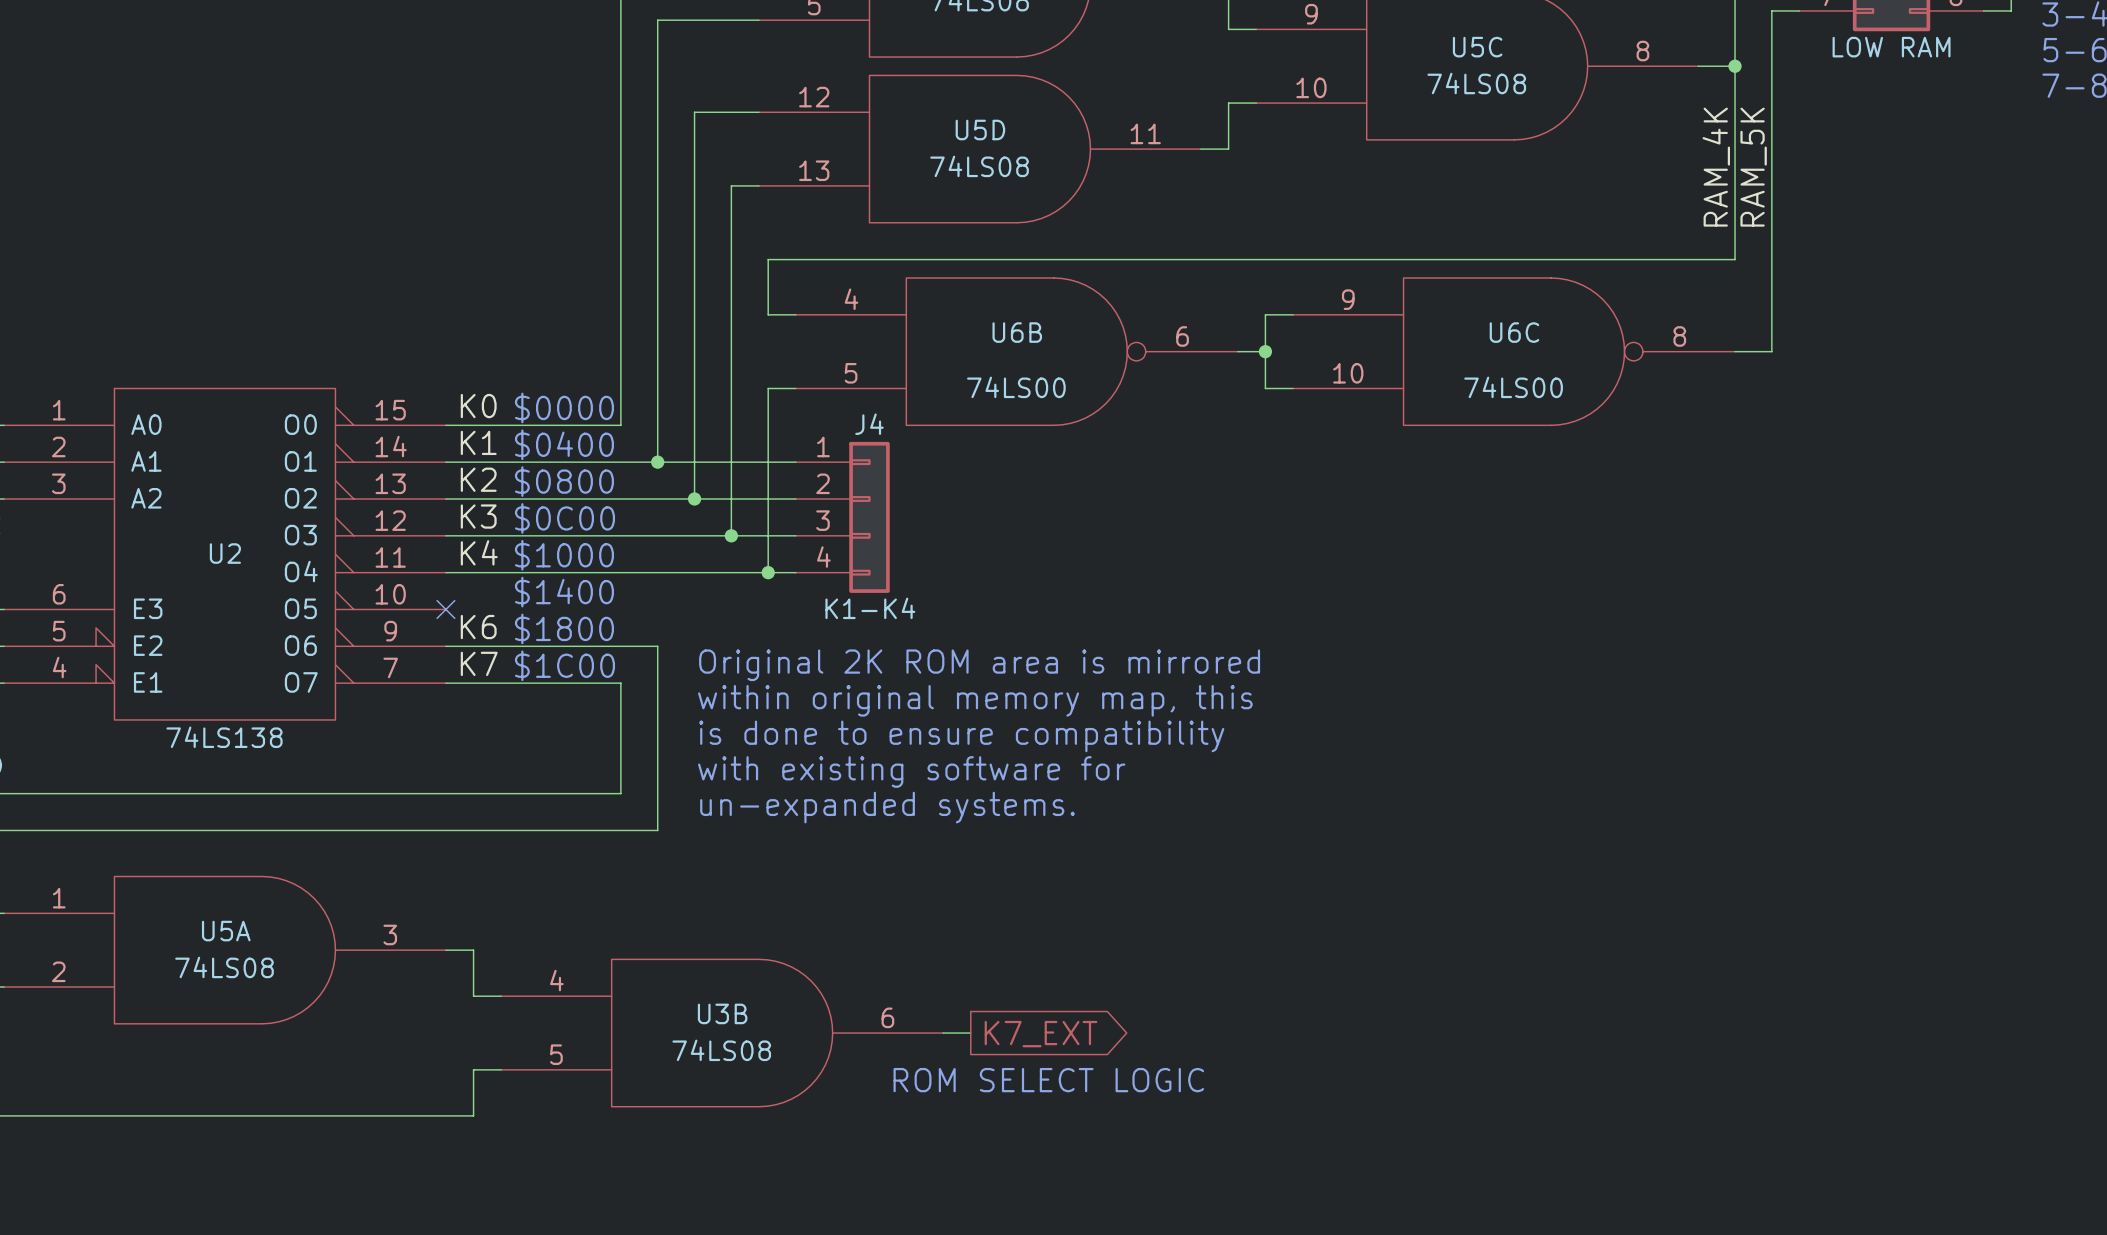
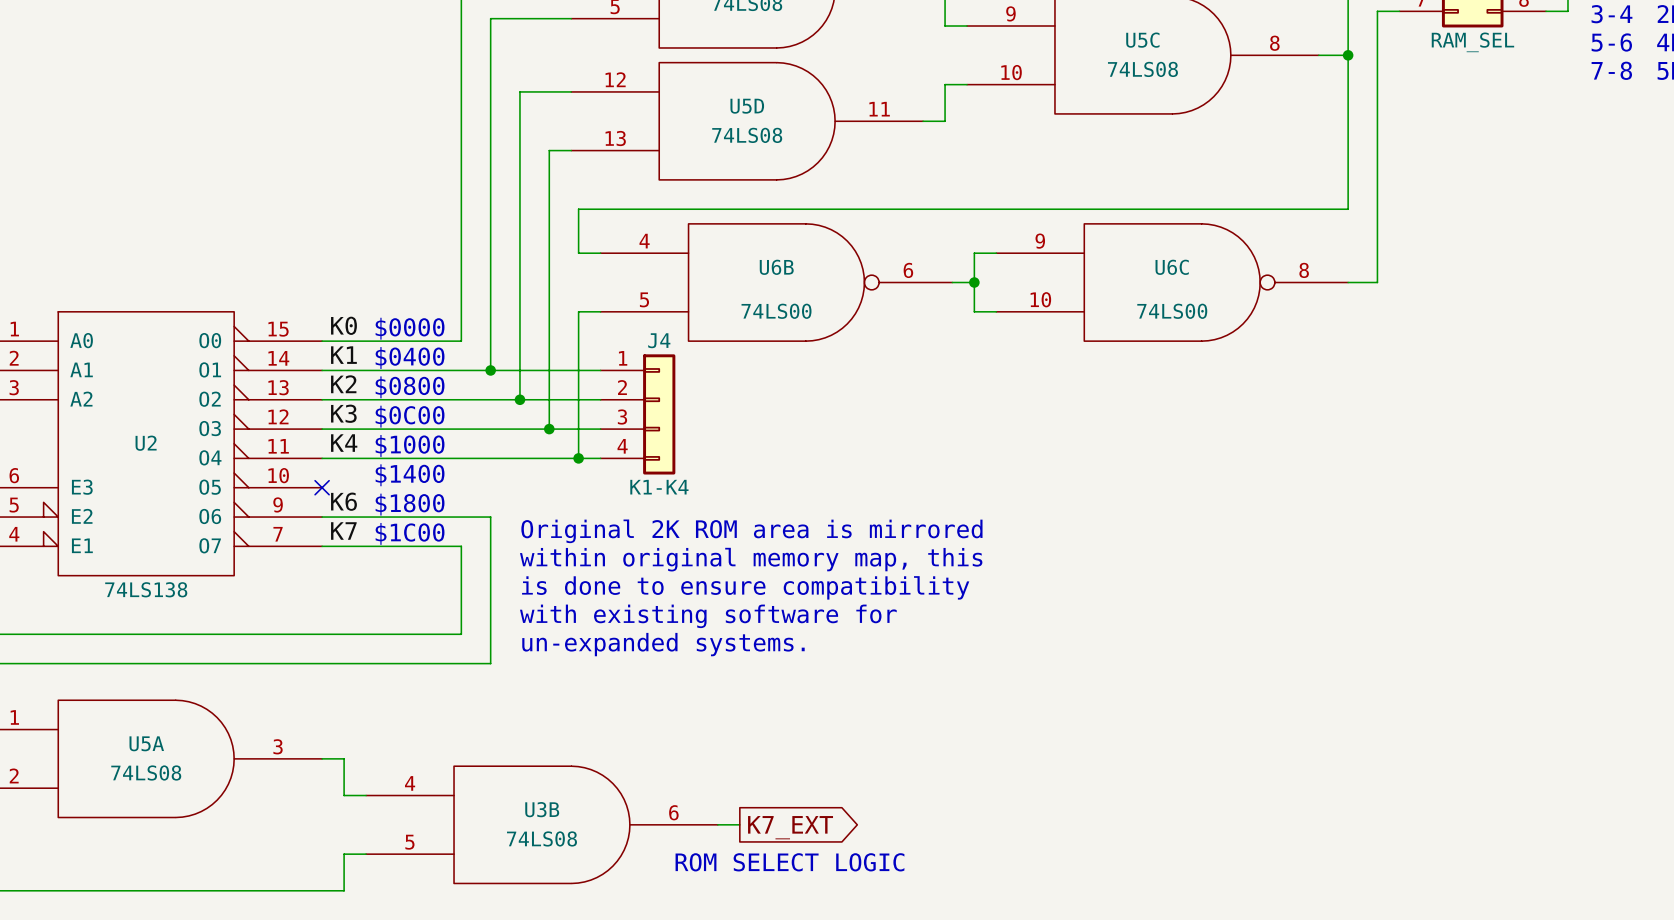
part value: LOW RAM (1891, 47) -> RAM_SEL (1472, 42)
label: RAM_4K (1716, 167) -> none
label: RAM_5K (1753, 167) -> none

